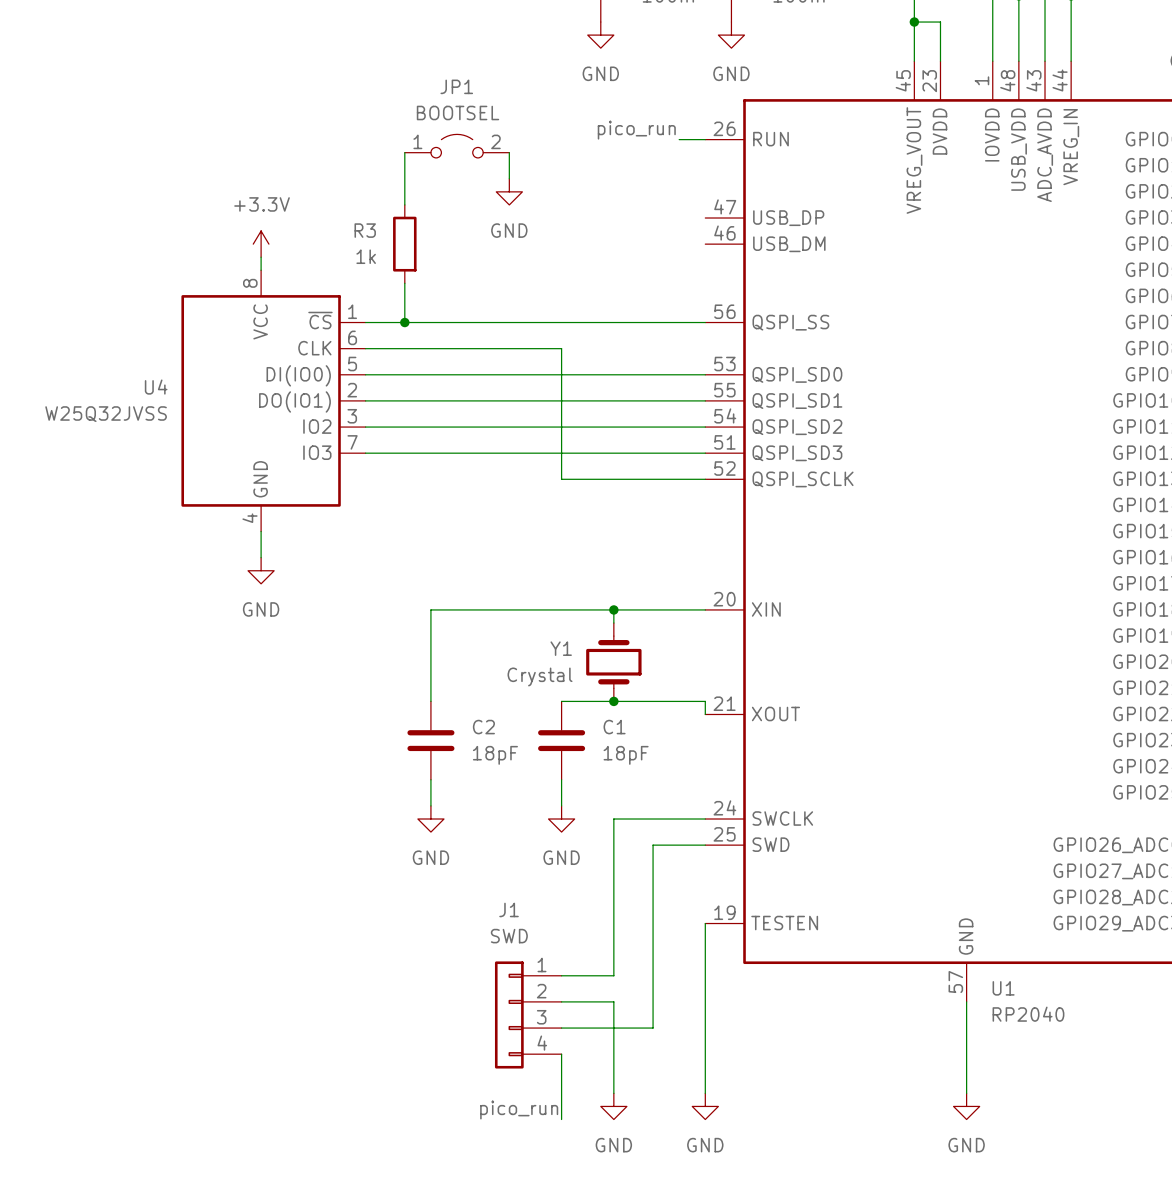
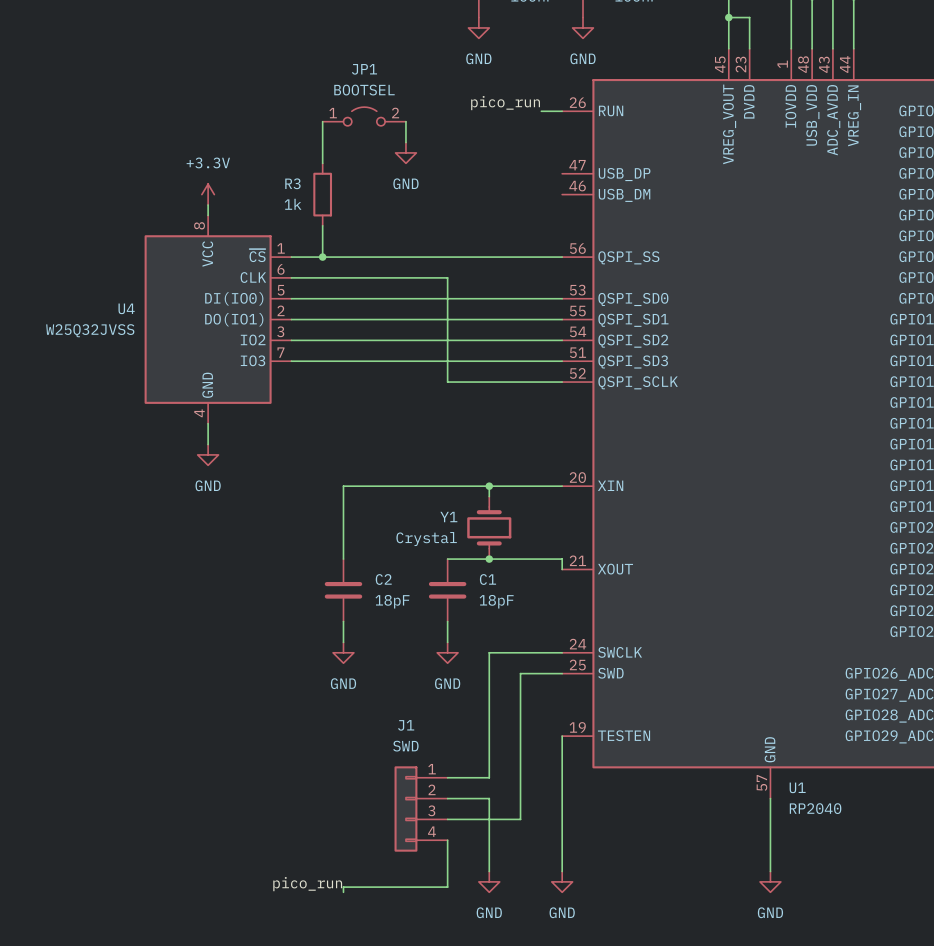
label position: pico_run (519, 1110) -> pico_run (307, 884)
wire: (561, 1112) (561, 1119) -> (447, 887) (343, 887) (343, 892)

